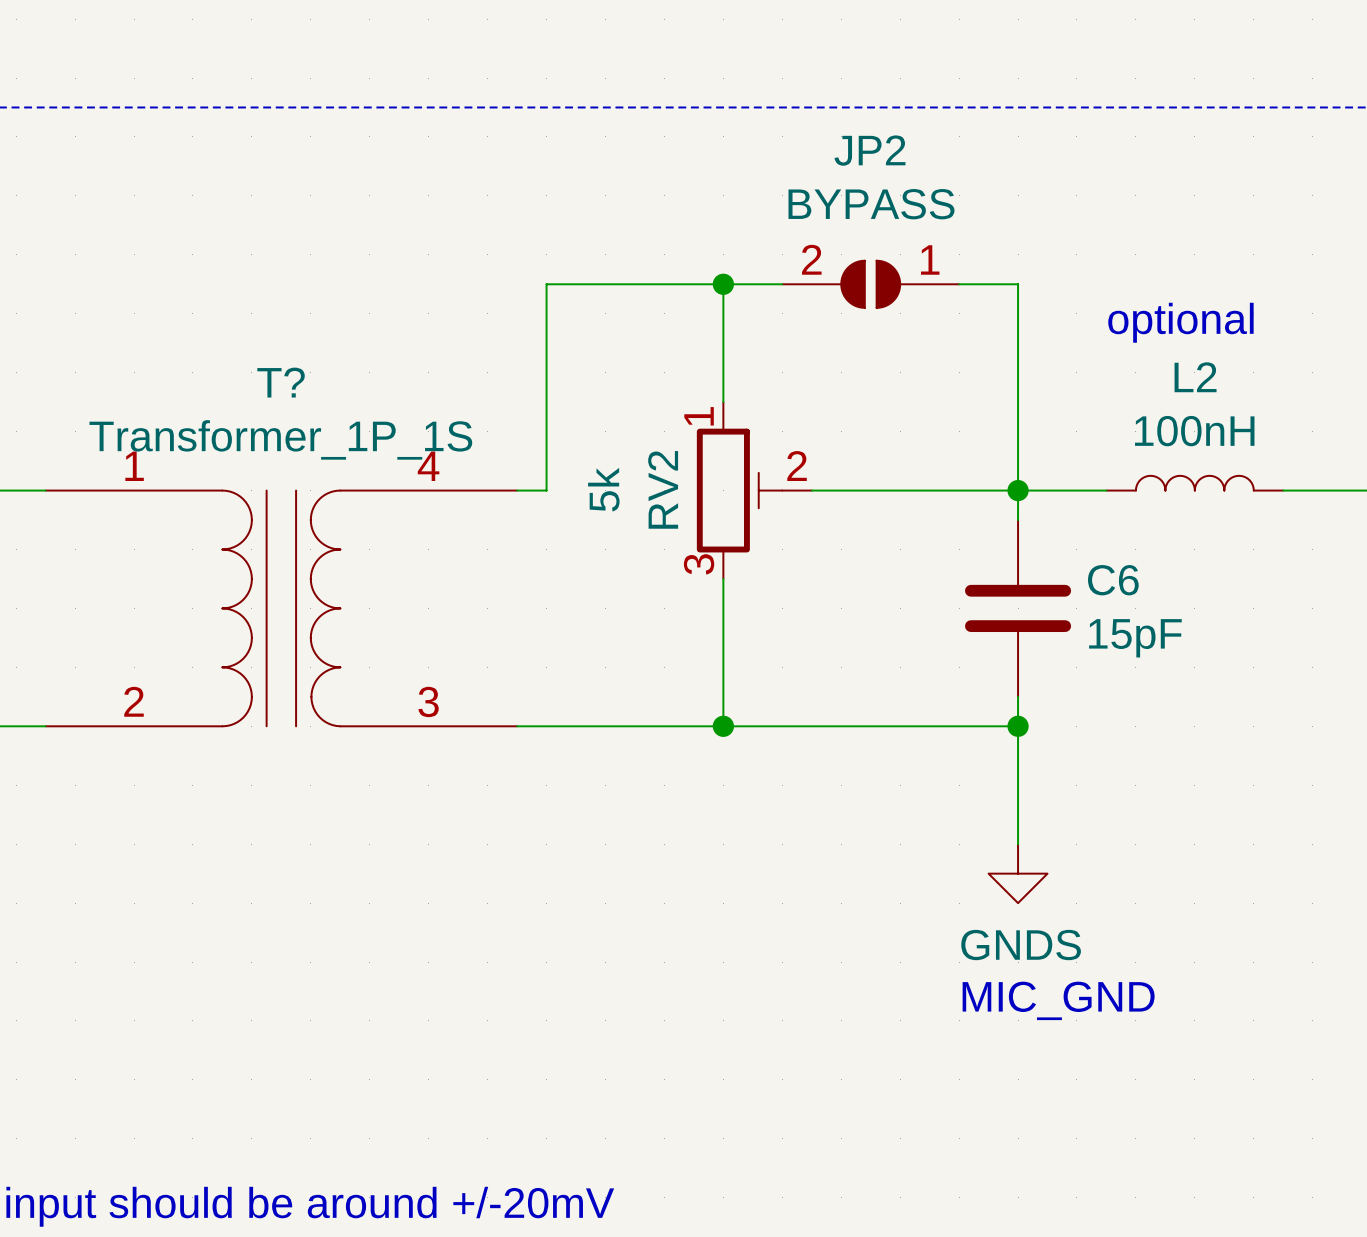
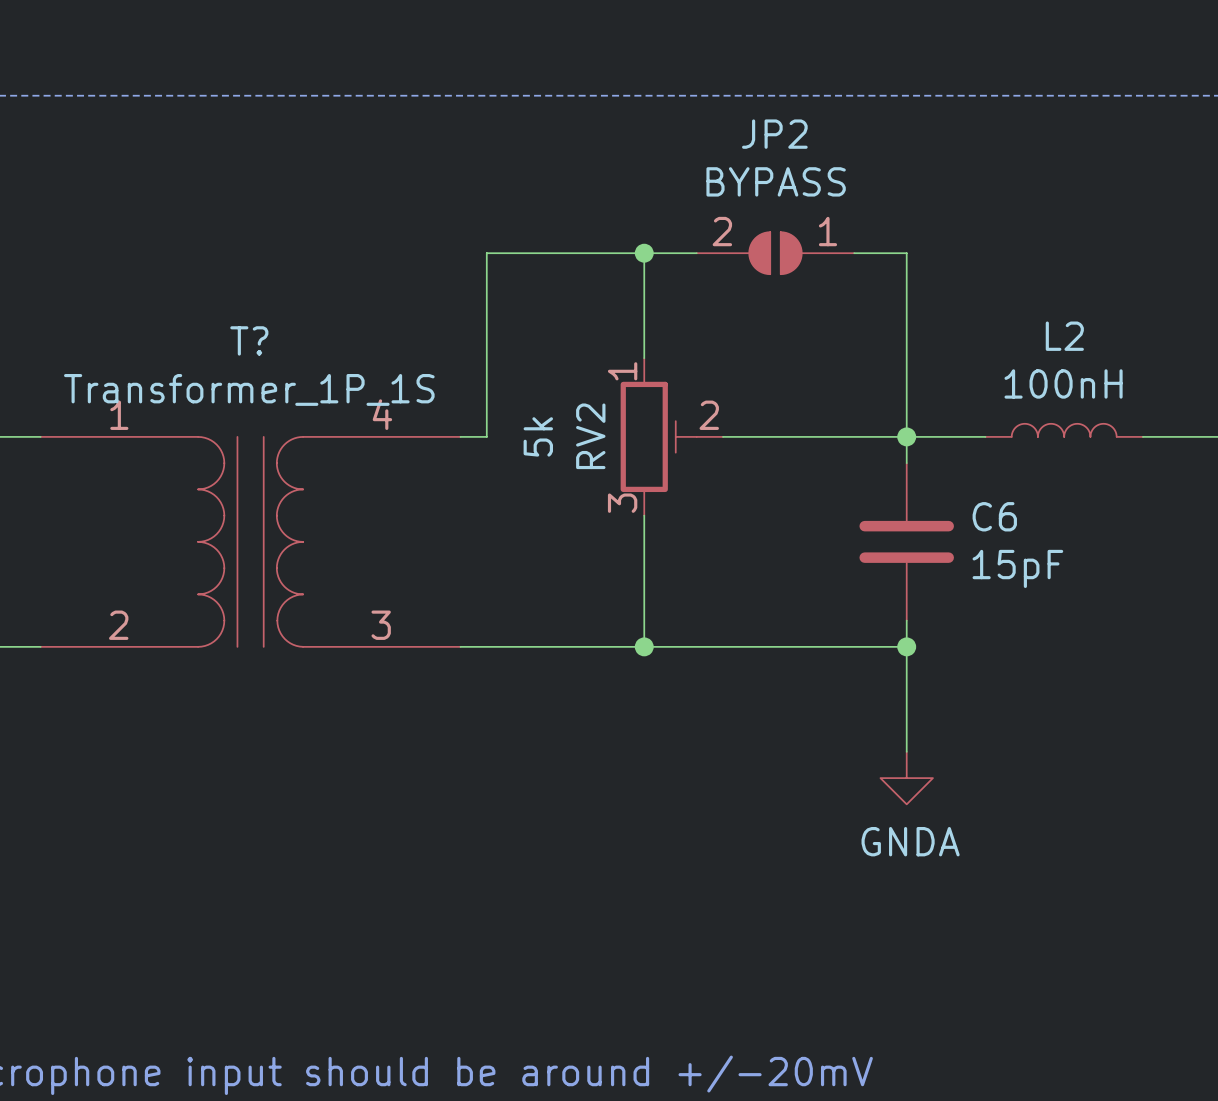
text: optional (1180, 322) -> none
power symbol: GNDS (1018, 873) -> GNDA (906, 778)
text: MIC_GND (1058, 1000) -> none

